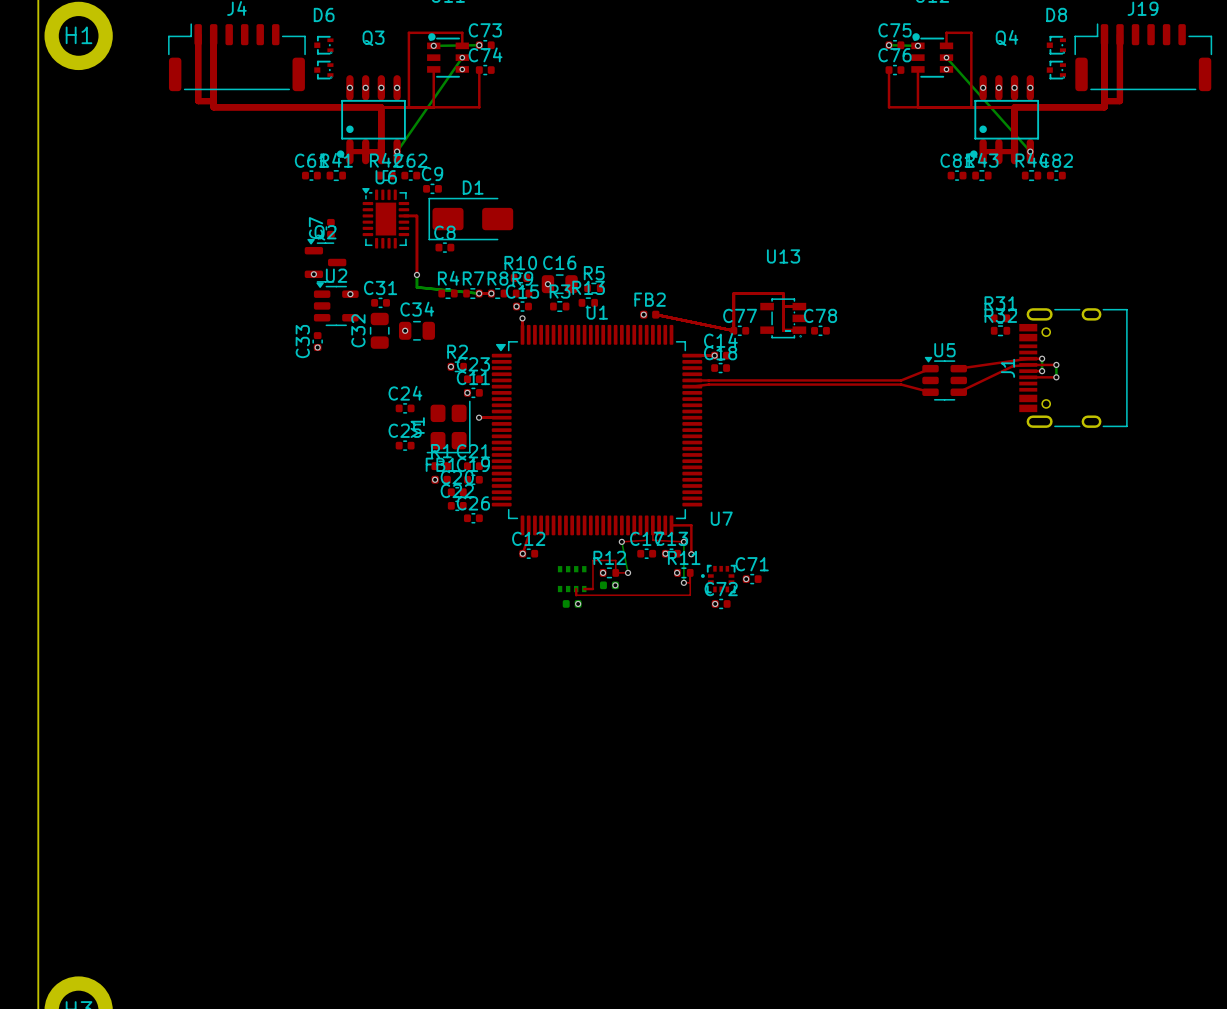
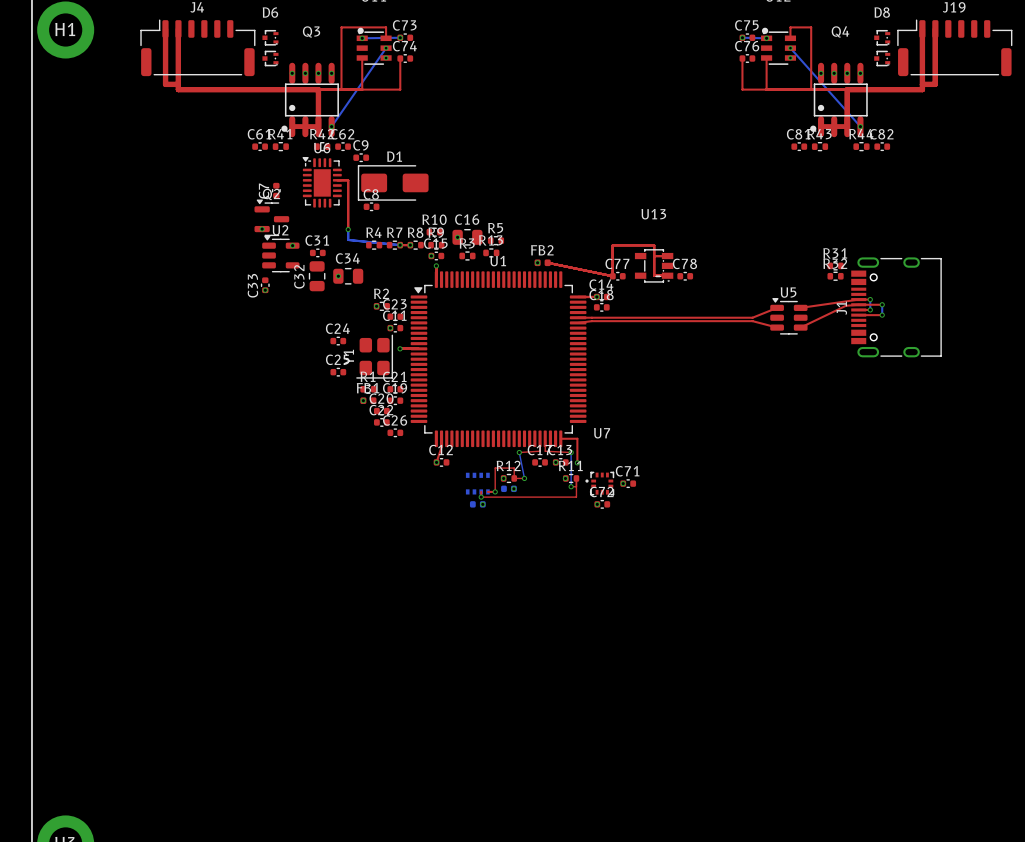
via: none -> (495, 491)
via: none -> (481, 497)

